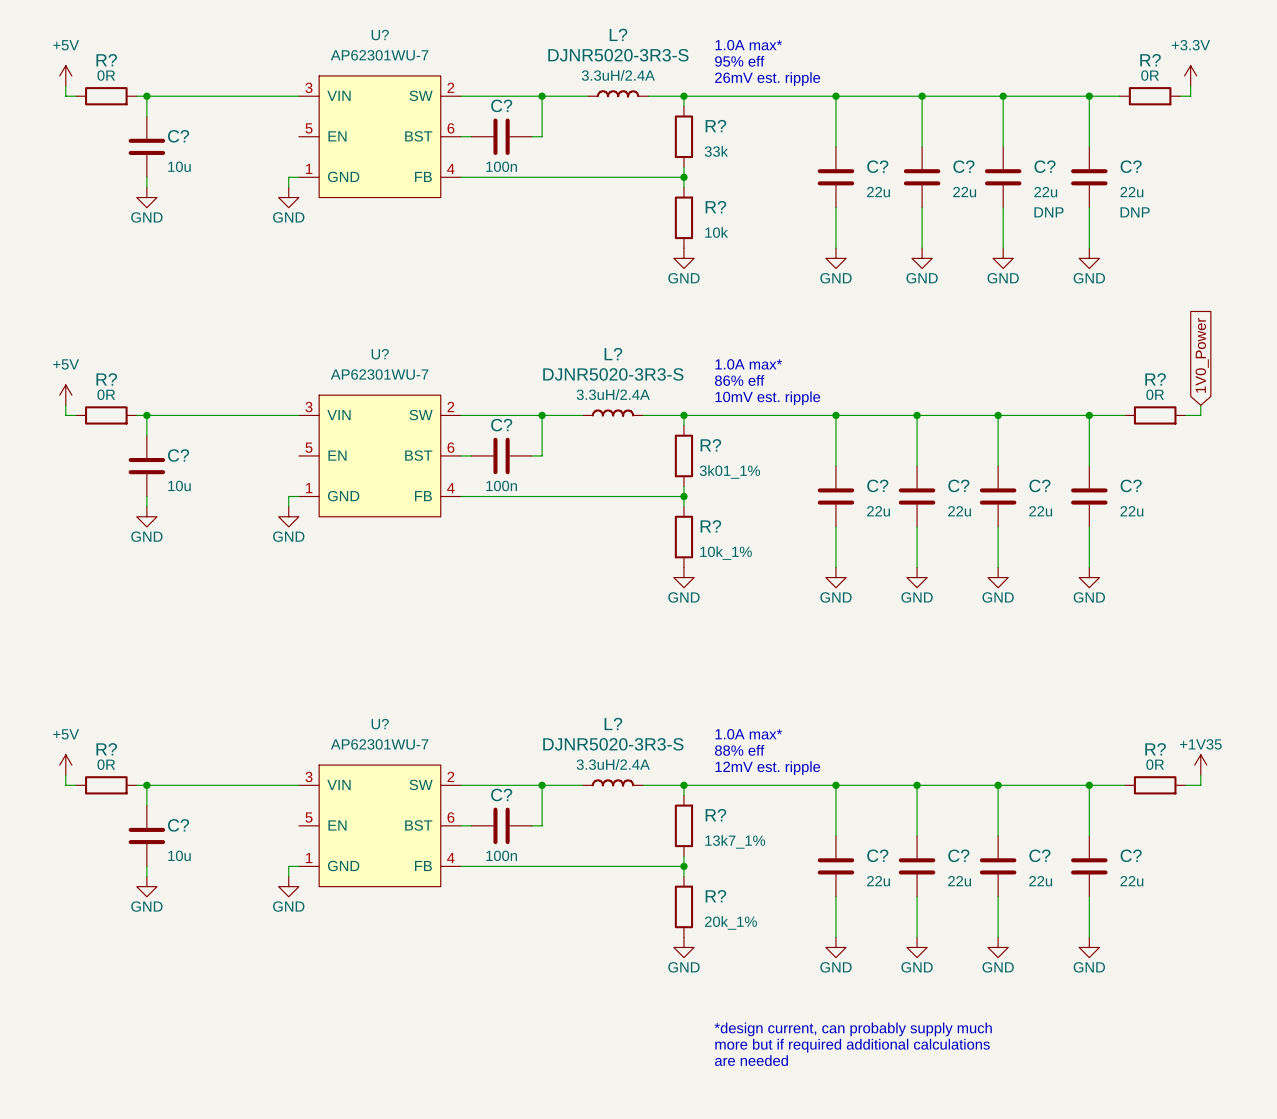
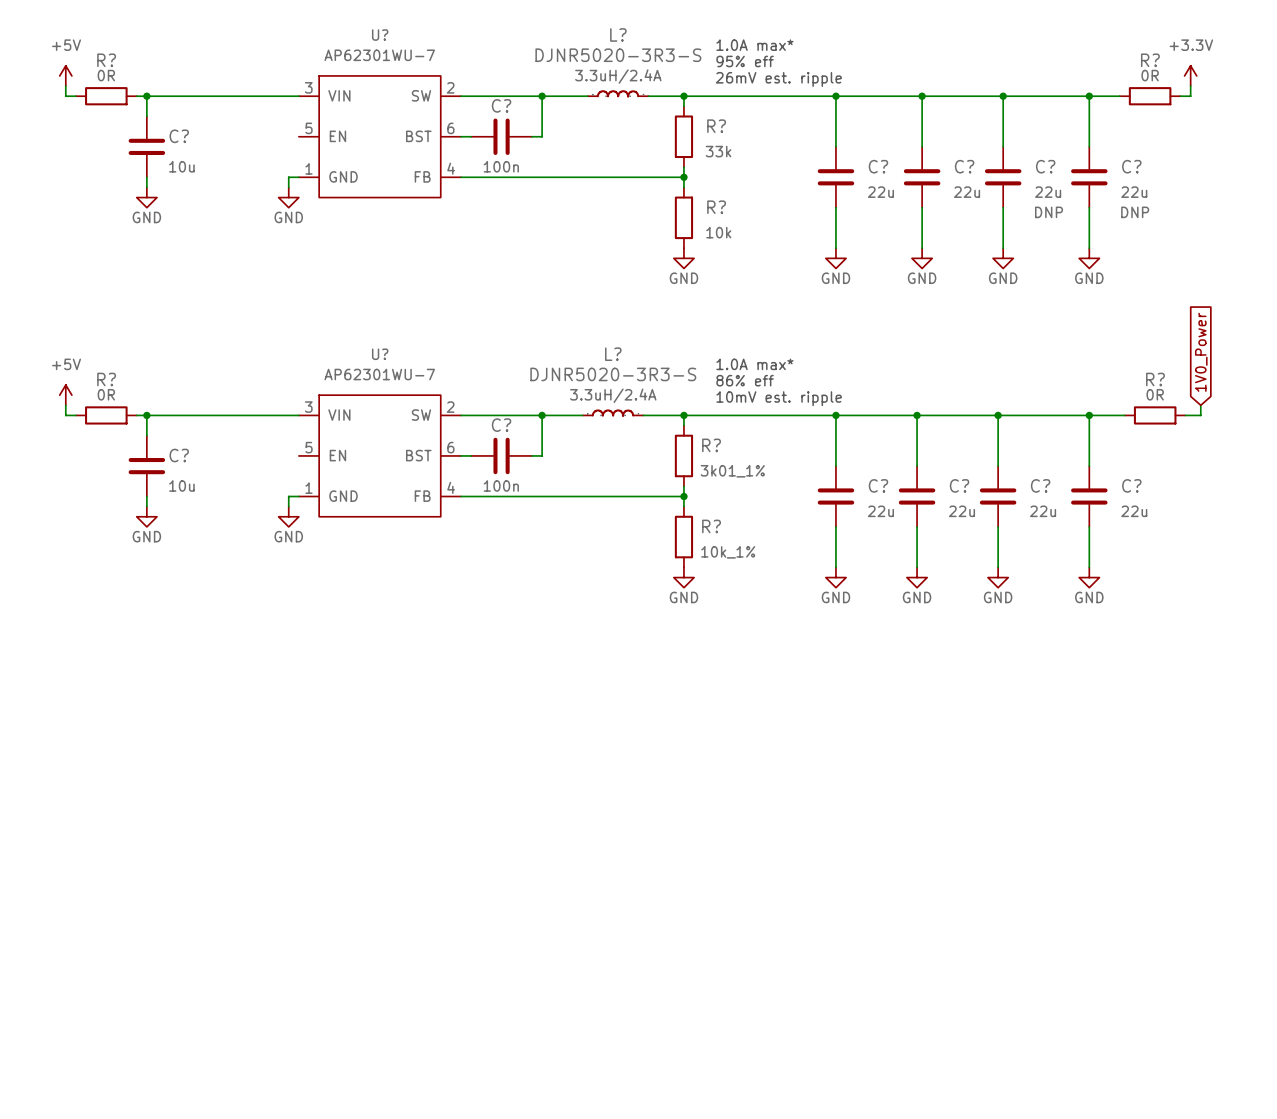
text: 1.0A max* (748, 734) -> none
text: 88% eff (739, 750) -> none
power symbol: +5V (65, 765) -> none
power symbol: +1V35 (1200, 765) -> none
text: 12mV est. ripple (767, 768) -> none
wire: (65, 775) (65, 785) (75, 785) -> none
wire: (1200, 775) (1200, 785) (1185, 785) -> none
L?: DJNR5020-3R3-S (613, 783) -> none
R?: (106, 785) -> none
wire: (136, 785) (298, 785) -> none
wire: (146, 785) (146, 805) -> none
junction: (146, 785) -> none
wire: (461, 785) (582, 785) -> none
wire: (542, 785) (542, 825) (531, 825) -> none
junction: (542, 785) -> none
wire: (643, 785) (1124, 785) -> none
wire: (683, 785) (683, 795) -> none
junction: (683, 785) -> none
wire: (835, 785) (835, 835) -> none
junction: (835, 785) -> none
wire: (917, 785) (917, 835) -> none
junction: (917, 785) -> none
wire: (998, 785) (998, 835) -> none
junction: (998, 785) -> none
wire: (1089, 785) (1089, 835) -> none
junction: (1089, 785) -> none
R?: (1155, 785) -> none
U?: AP62301WU-7 (379, 825) -> none
wire: (461, 825) (471, 825) -> none
C?: (501, 825) -> none
R?: (683, 825) -> none
C?: (146, 835) -> none
wire: (683, 856) (683, 876) -> none
wire: (146, 866) (146, 876) -> none
wire: (298, 866) (288, 866) (288, 876) -> none
wire: (461, 866) (683, 866) -> none
junction: (683, 866) -> none
C?: (835, 866) -> none
C?: (917, 866) -> none
C?: (998, 866) -> none
C?: (1089, 866) -> none
power symbol: GND (146, 886) -> none
power symbol: GND (288, 886) -> none
wire: (835, 896) (835, 937) -> none
wire: (917, 896) (917, 937) -> none
wire: (998, 896) (998, 937) -> none
wire: (1089, 896) (1089, 937) -> none
R?: (683, 906) -> none
power symbol: GND (683, 947) -> none
power symbol: GND (835, 947) -> none
power symbol: GND (917, 947) -> none
power symbol: GND (998, 947) -> none
power symbol: GND (1089, 947) -> none
text: *design current, can probably supply much (853, 1029) -> none
text: more but if required additional calculations (852, 1045) -> none
text: are needed (751, 1060) -> none

